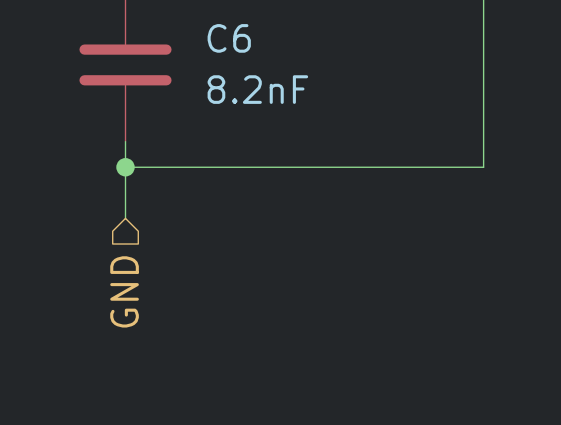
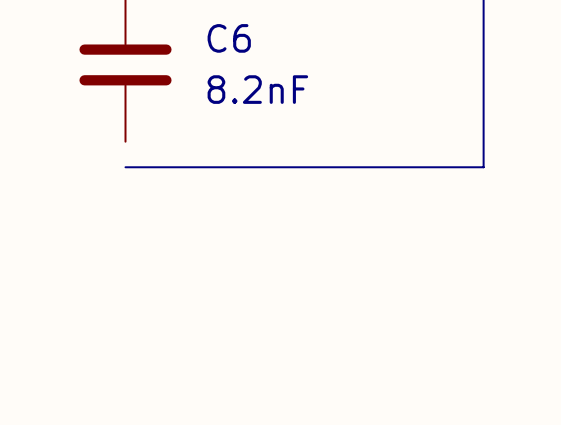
wire: (125, 141) (125, 218) -> none
junction: (125, 167) -> none
hierarchical label: GND (124, 291) -> none

